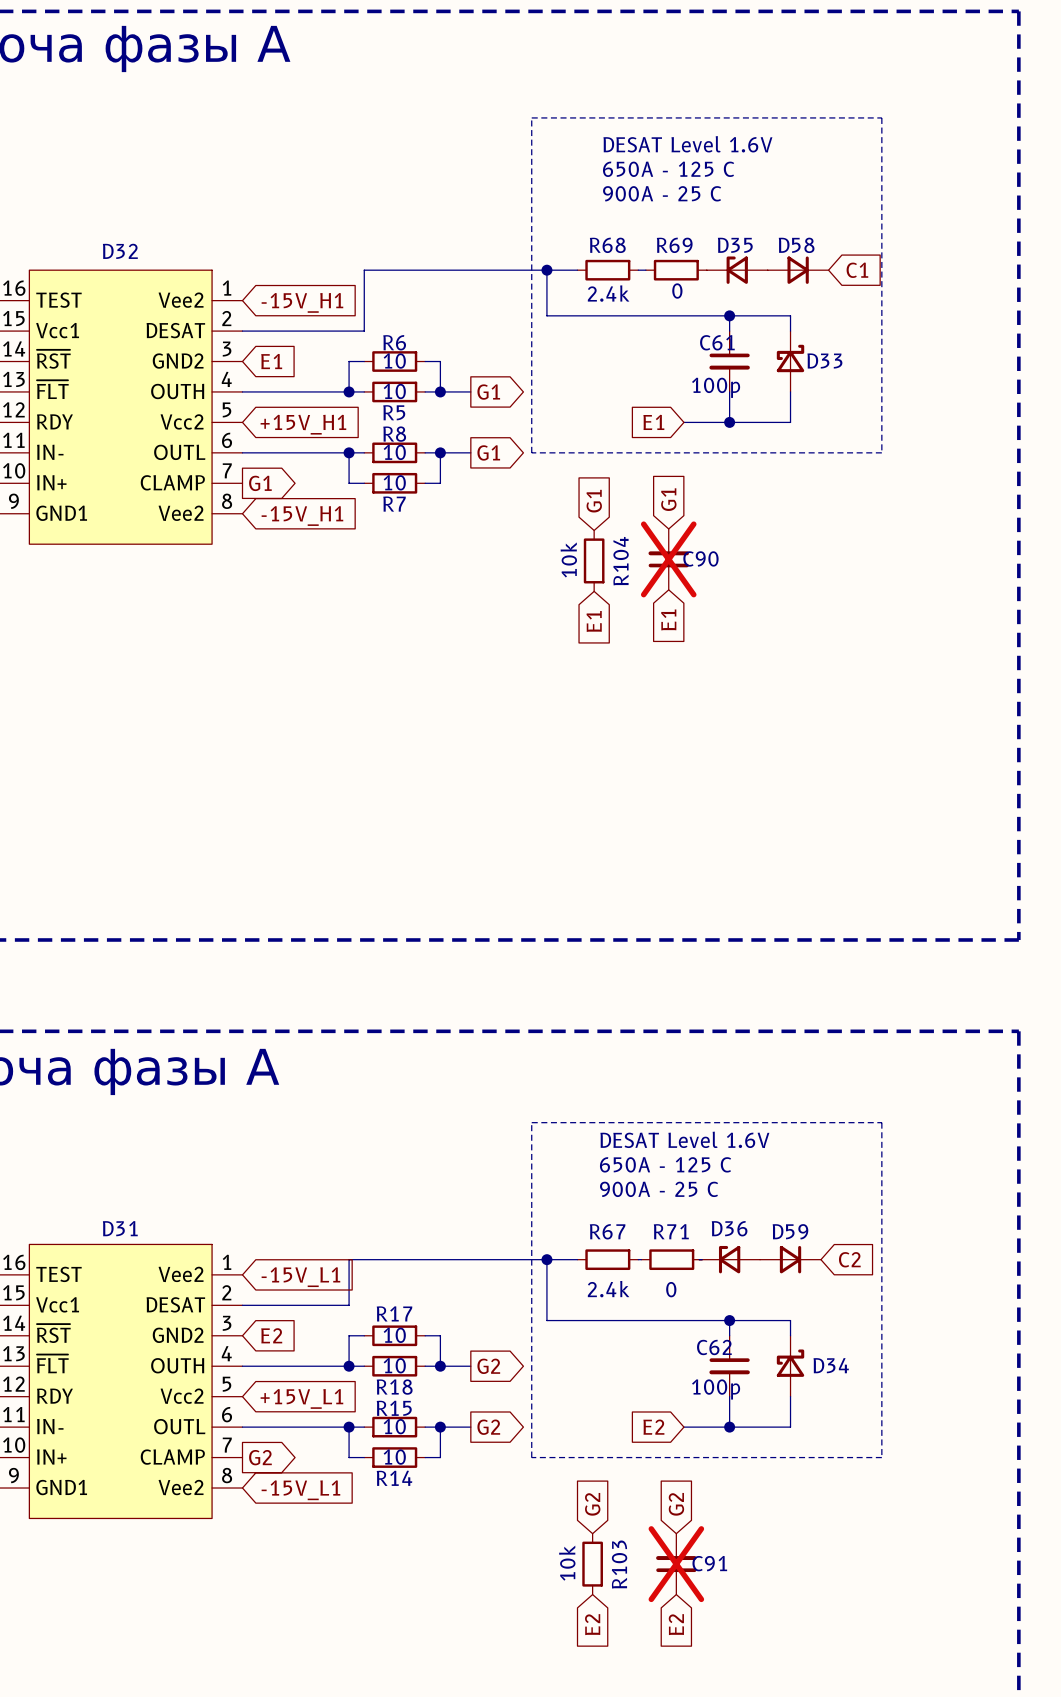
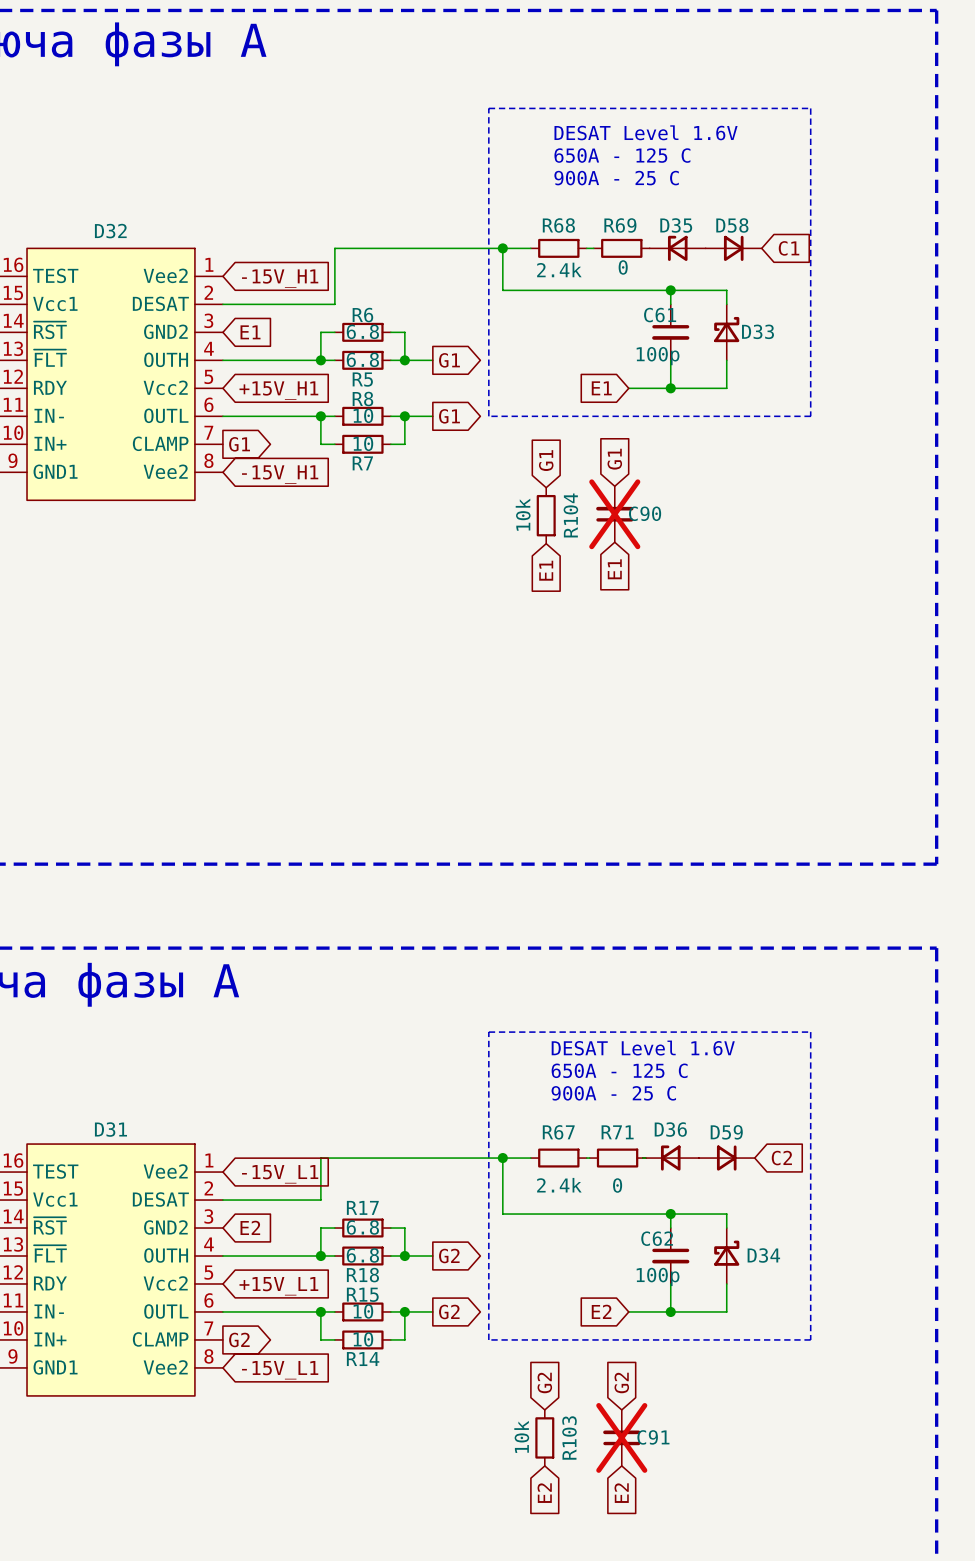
R6 value: 10 (394, 361) -> 6.8 (362, 331)
R5 value: 10 (394, 391) -> 6.8 (362, 359)
R17 value: 10 (394, 1335) -> 6.8 (362, 1227)
R18 value: 10 (394, 1365) -> 6.8 (362, 1255)

